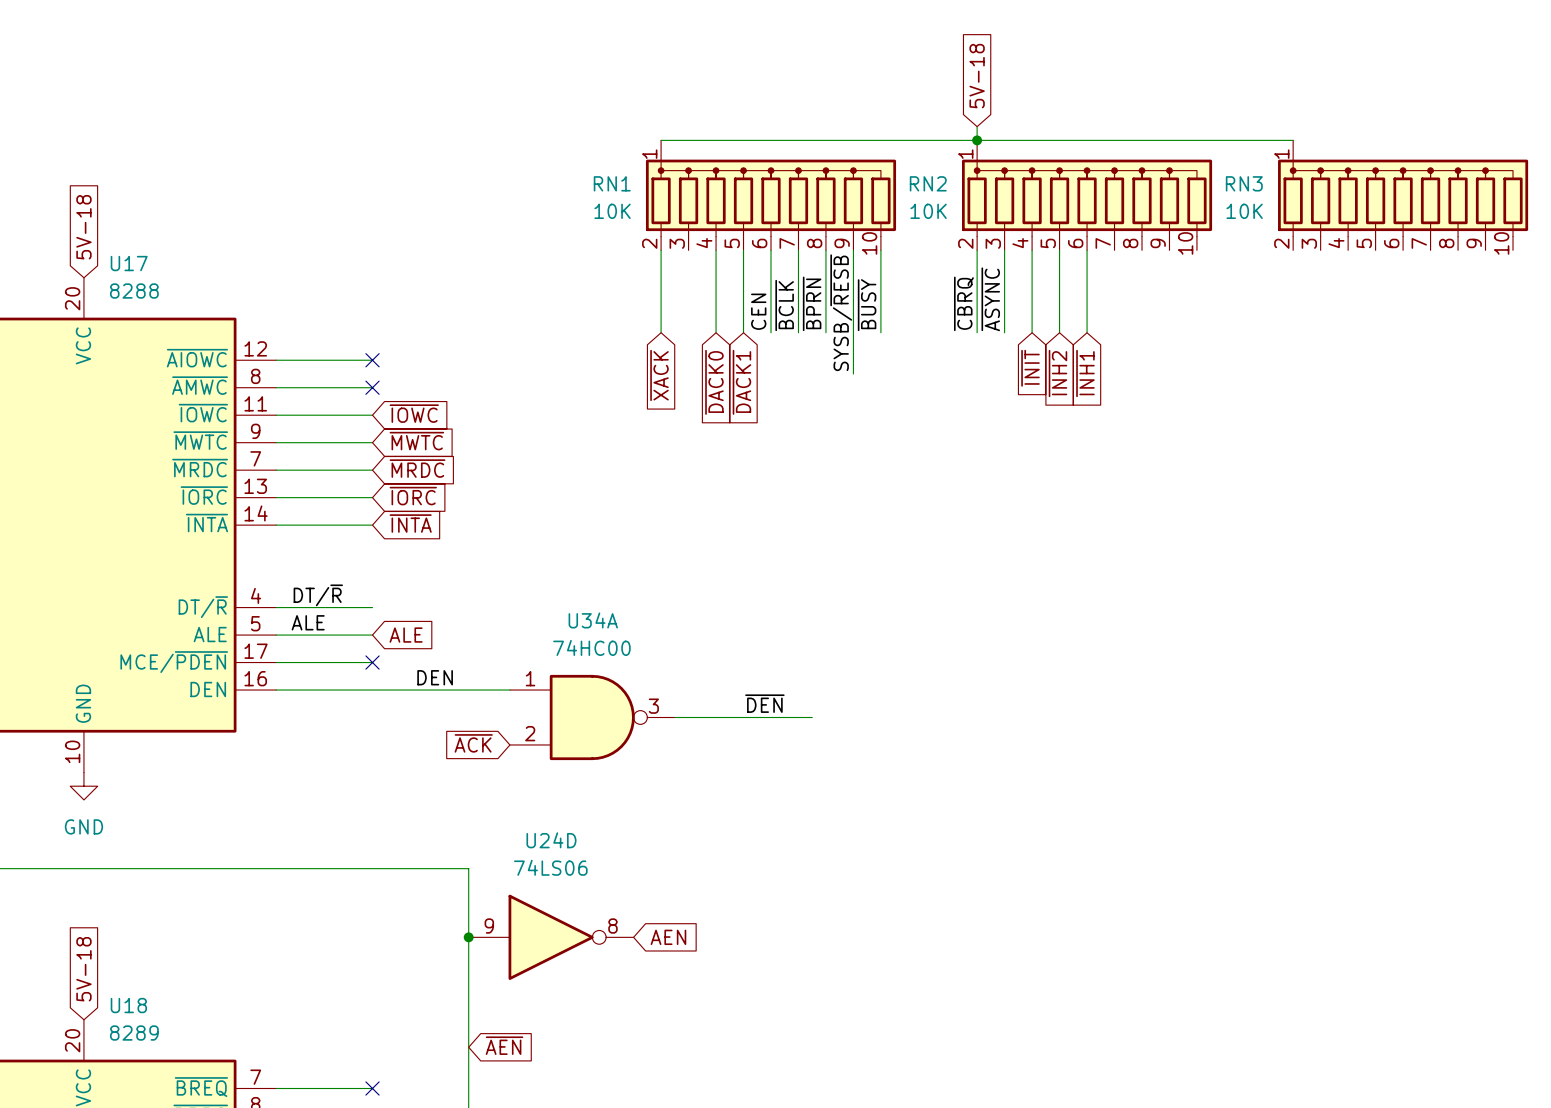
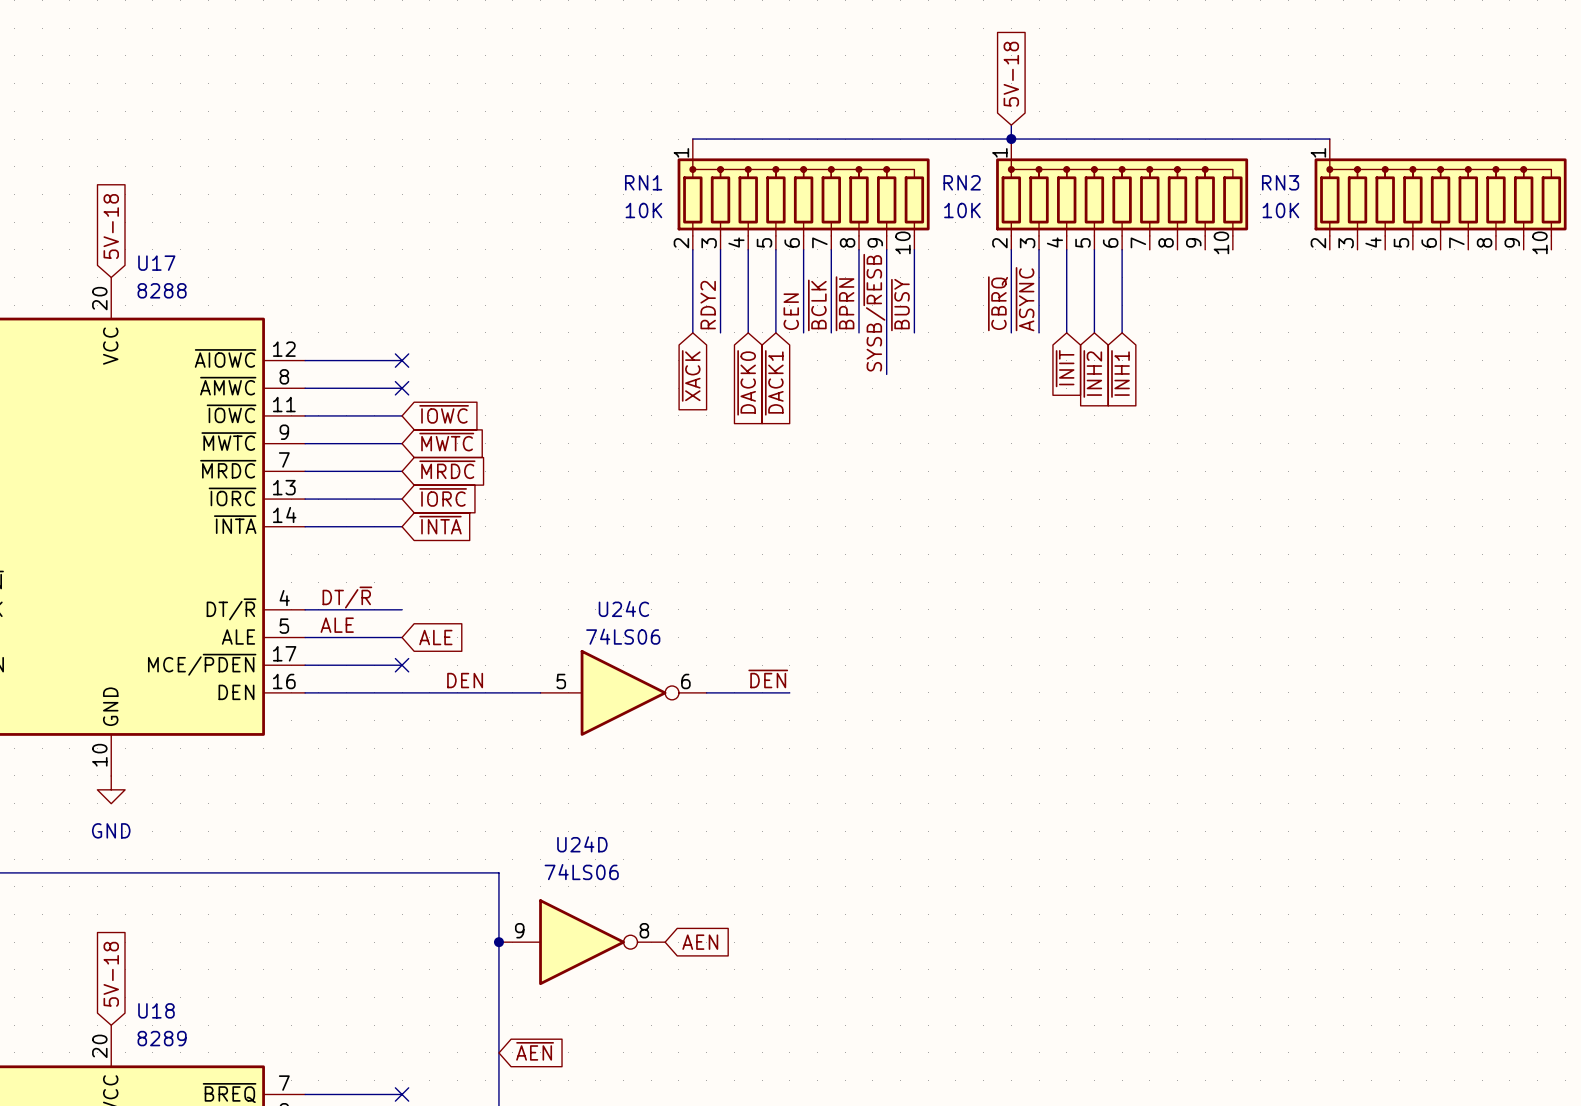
wire: none -> (720, 249) (720, 332)
label: none -> RDY2 (708, 305)
U24C: none -> 74LS06 (623, 692)
wire: none -> (706, 692) (789, 692)
label position: ~{DEN} (764, 703) -> ~{DEN} (768, 678)
U34A: 74HC00 (592, 717) -> none
wire: (674, 717) (812, 717) -> none
global label: ~{ACK} (473, 743) -> none

